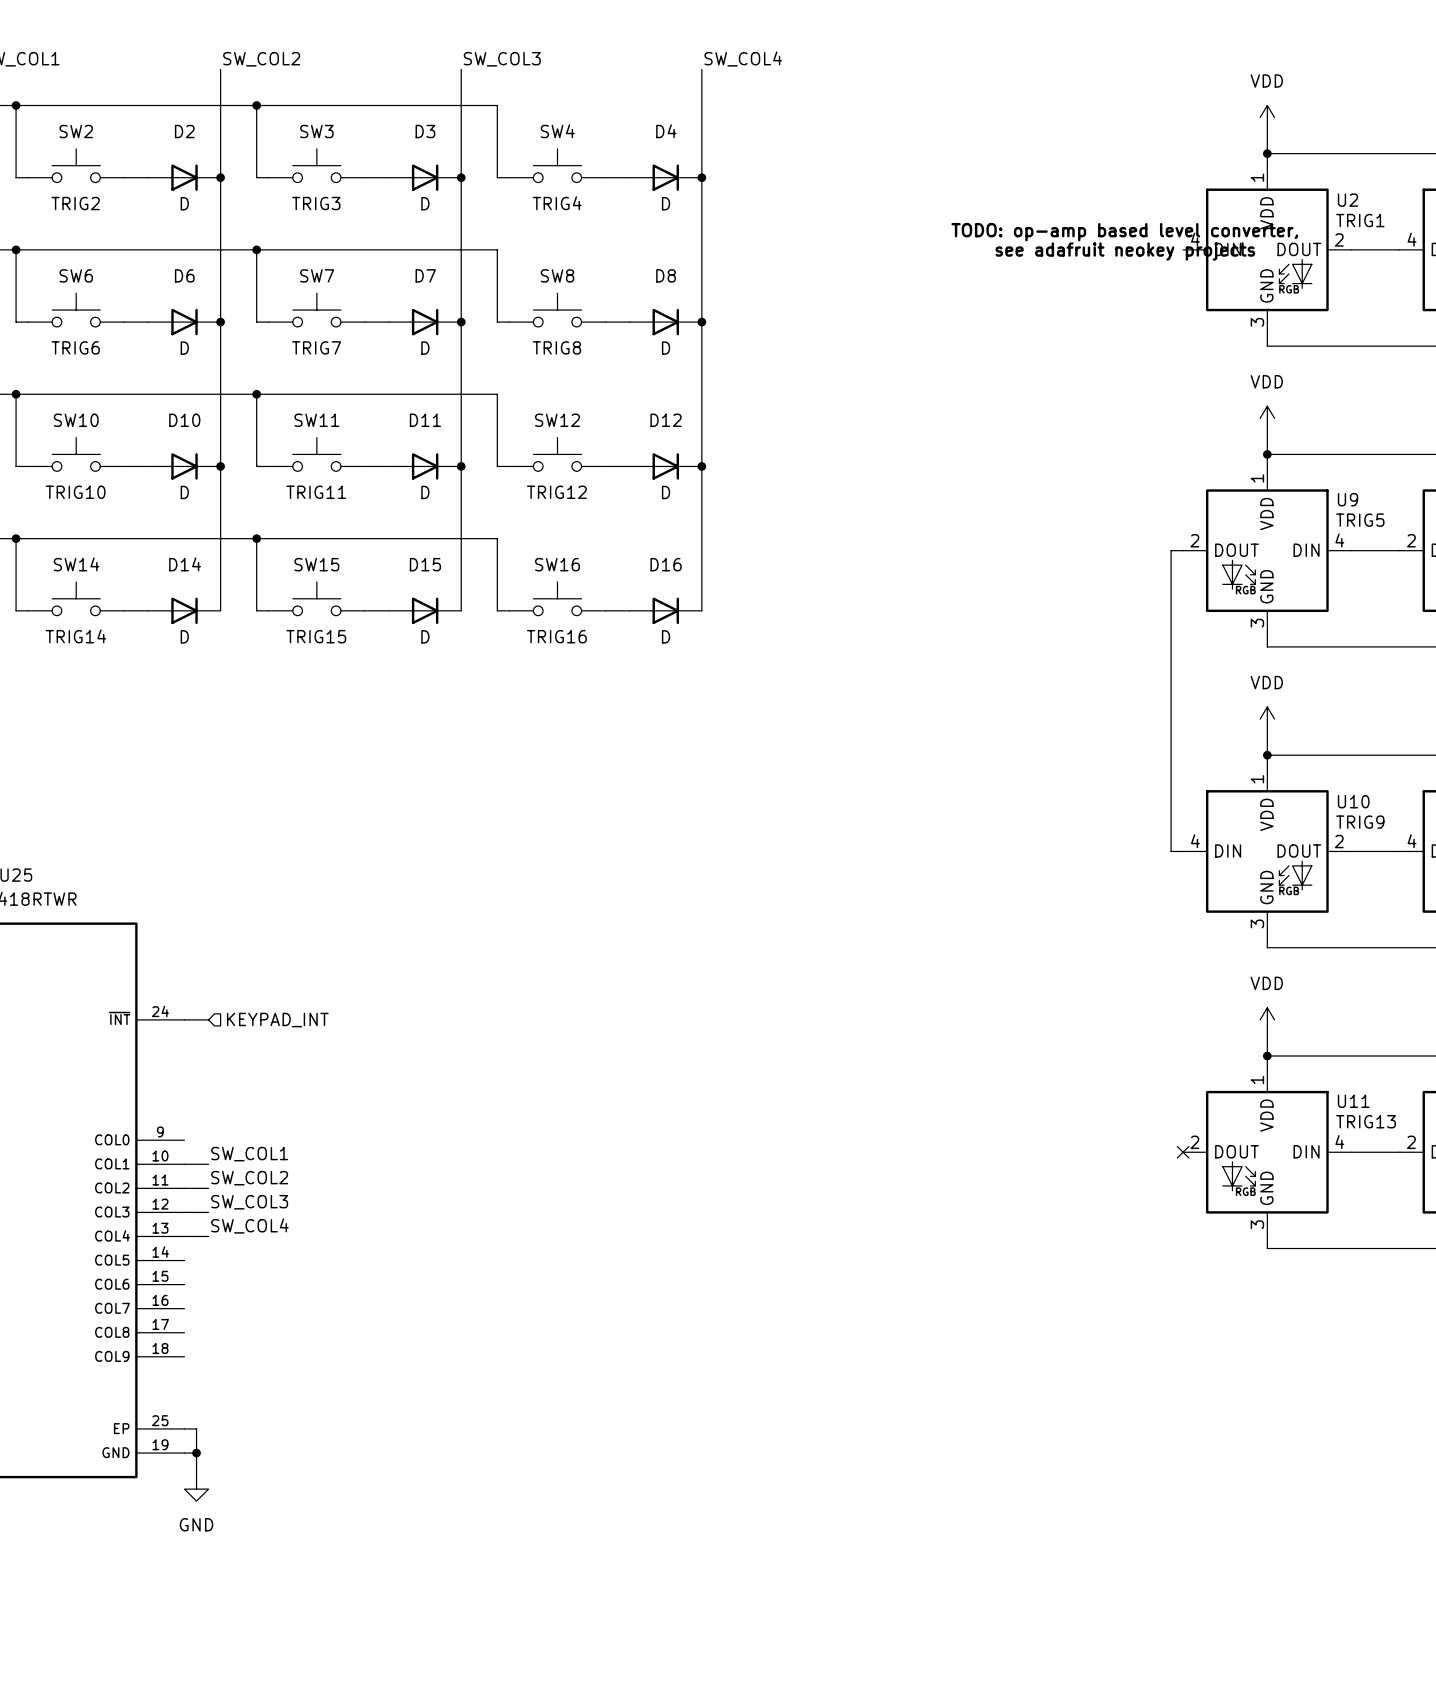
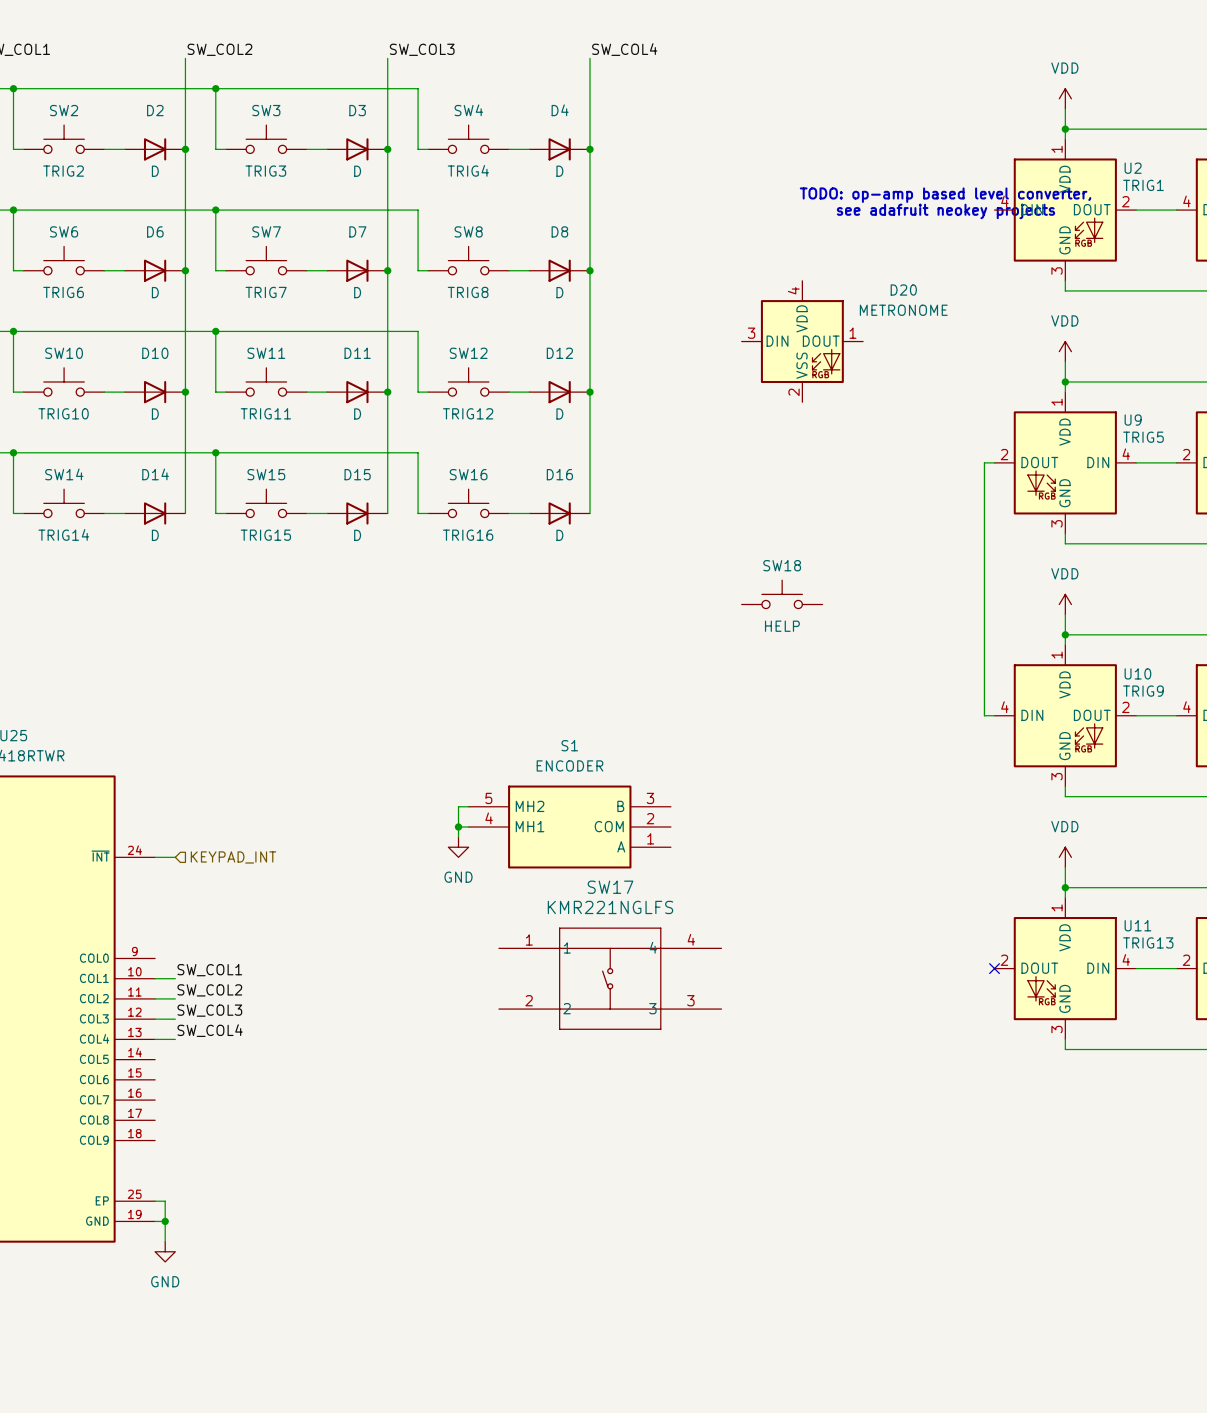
D20: none -> METRONOME (802, 341)
SW18: none -> HELP (782, 594)
wire: none -> (468, 806) (458, 806) (458, 837)
wire: none -> (458, 827) (468, 827)
junction: none -> (458, 827)
S1: none -> ENCODER (569, 827)
power symbol: none -> GND (458, 847)
SW17: none -> KMR221NGLFS (610, 978)

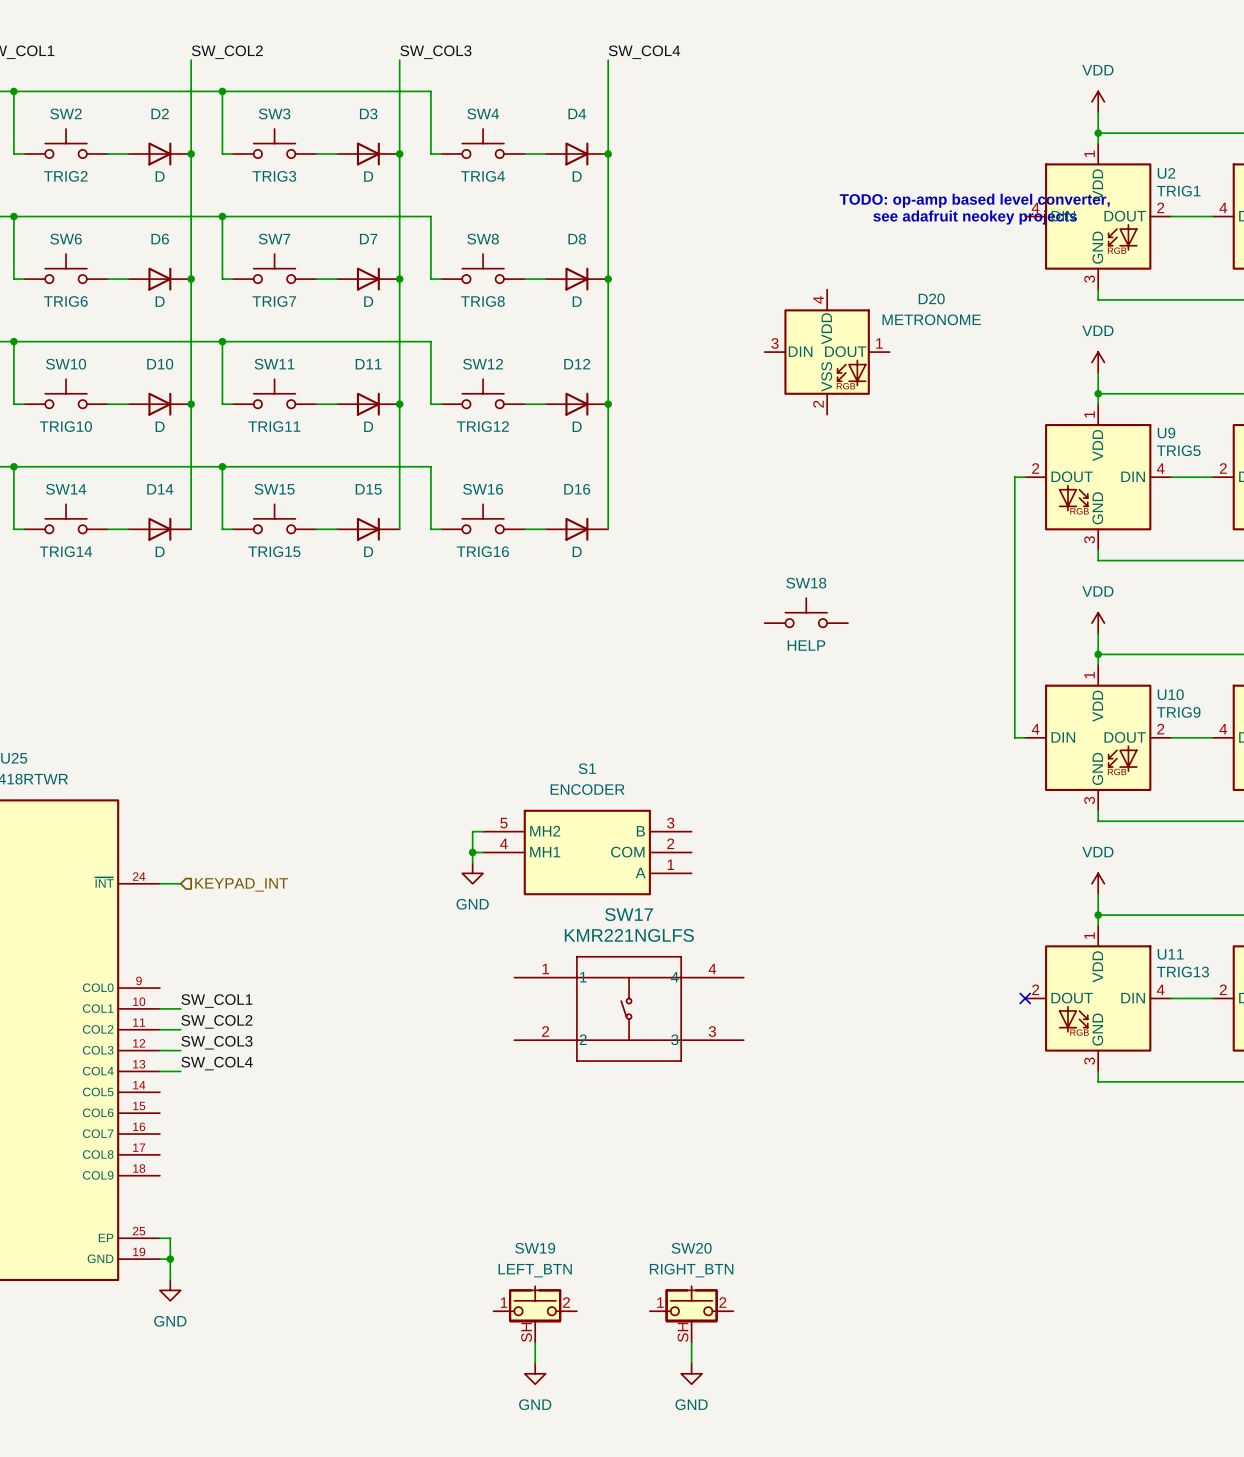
SW19: none -> LEFT_BTN (535, 1314)
SW20: none -> RIGHT_BTN (691, 1314)
wire: none -> (535, 1342) (535, 1363)
wire: none -> (691, 1342) (691, 1363)
power symbol: none -> GND (535, 1373)
power symbol: none -> GND (691, 1373)

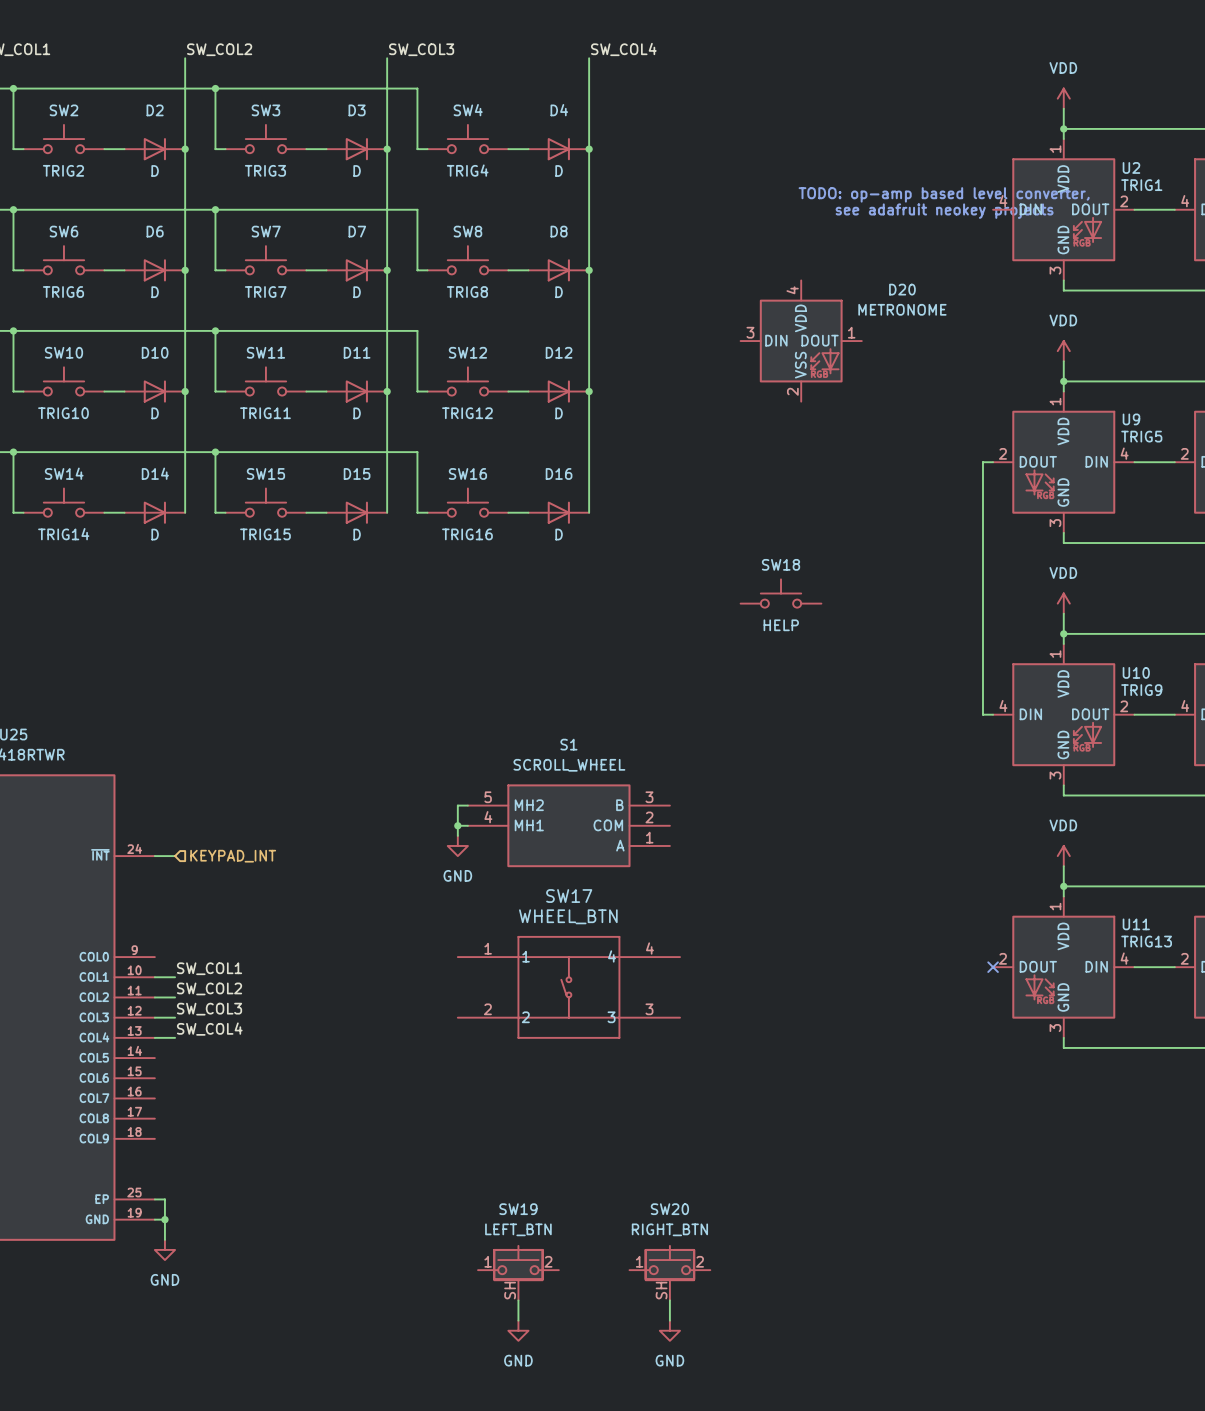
S1 value: ENCODER (587, 789) -> SCROLL_WHEEL (569, 765)
SW17 value: KMR221NGLFS (629, 935) -> WHEEL_BTN (568, 916)
SW17 position: (629, 1008) -> (568, 987)

